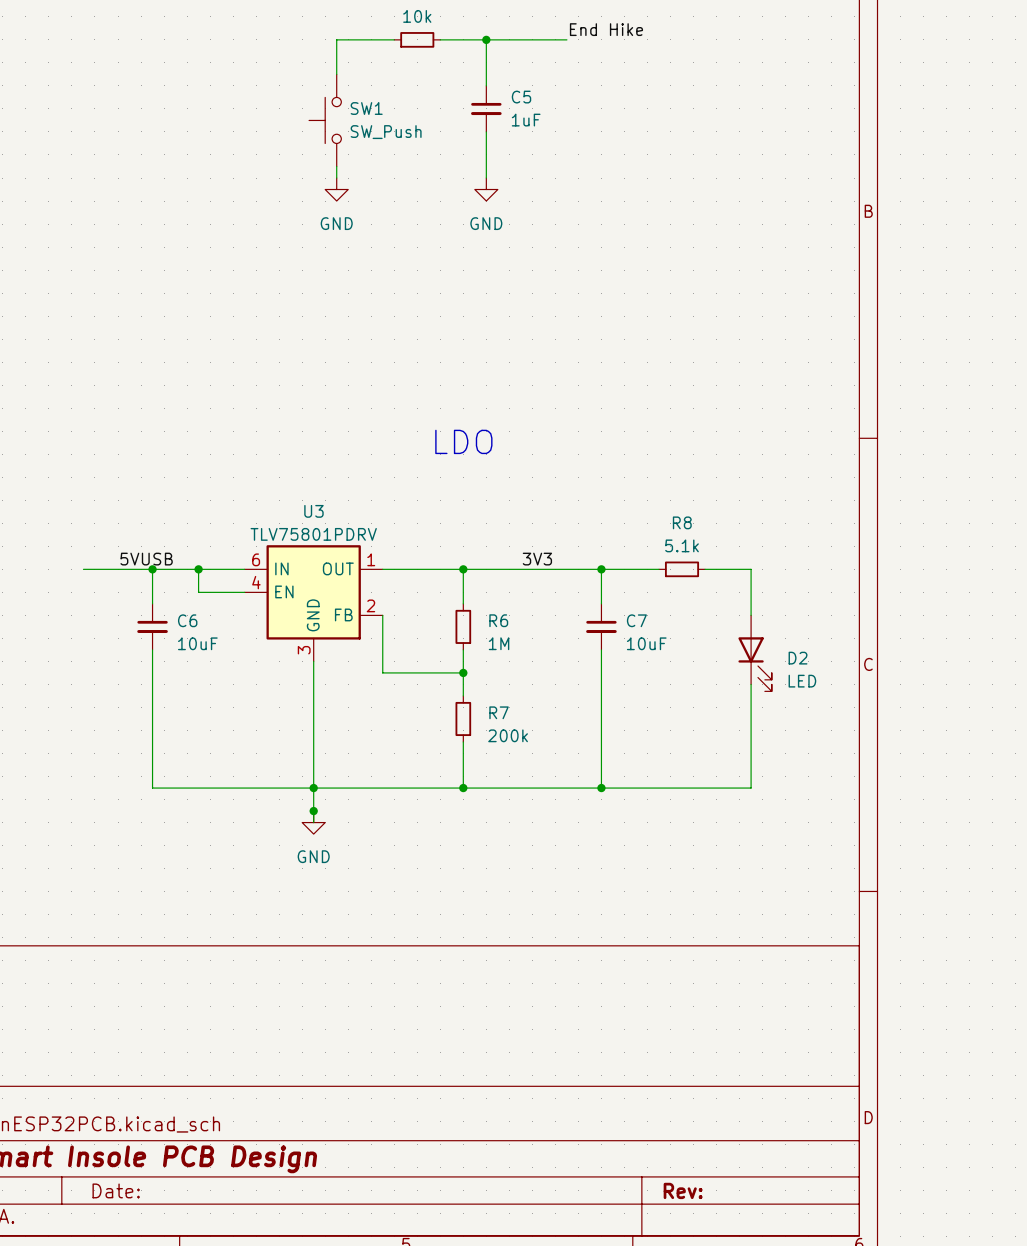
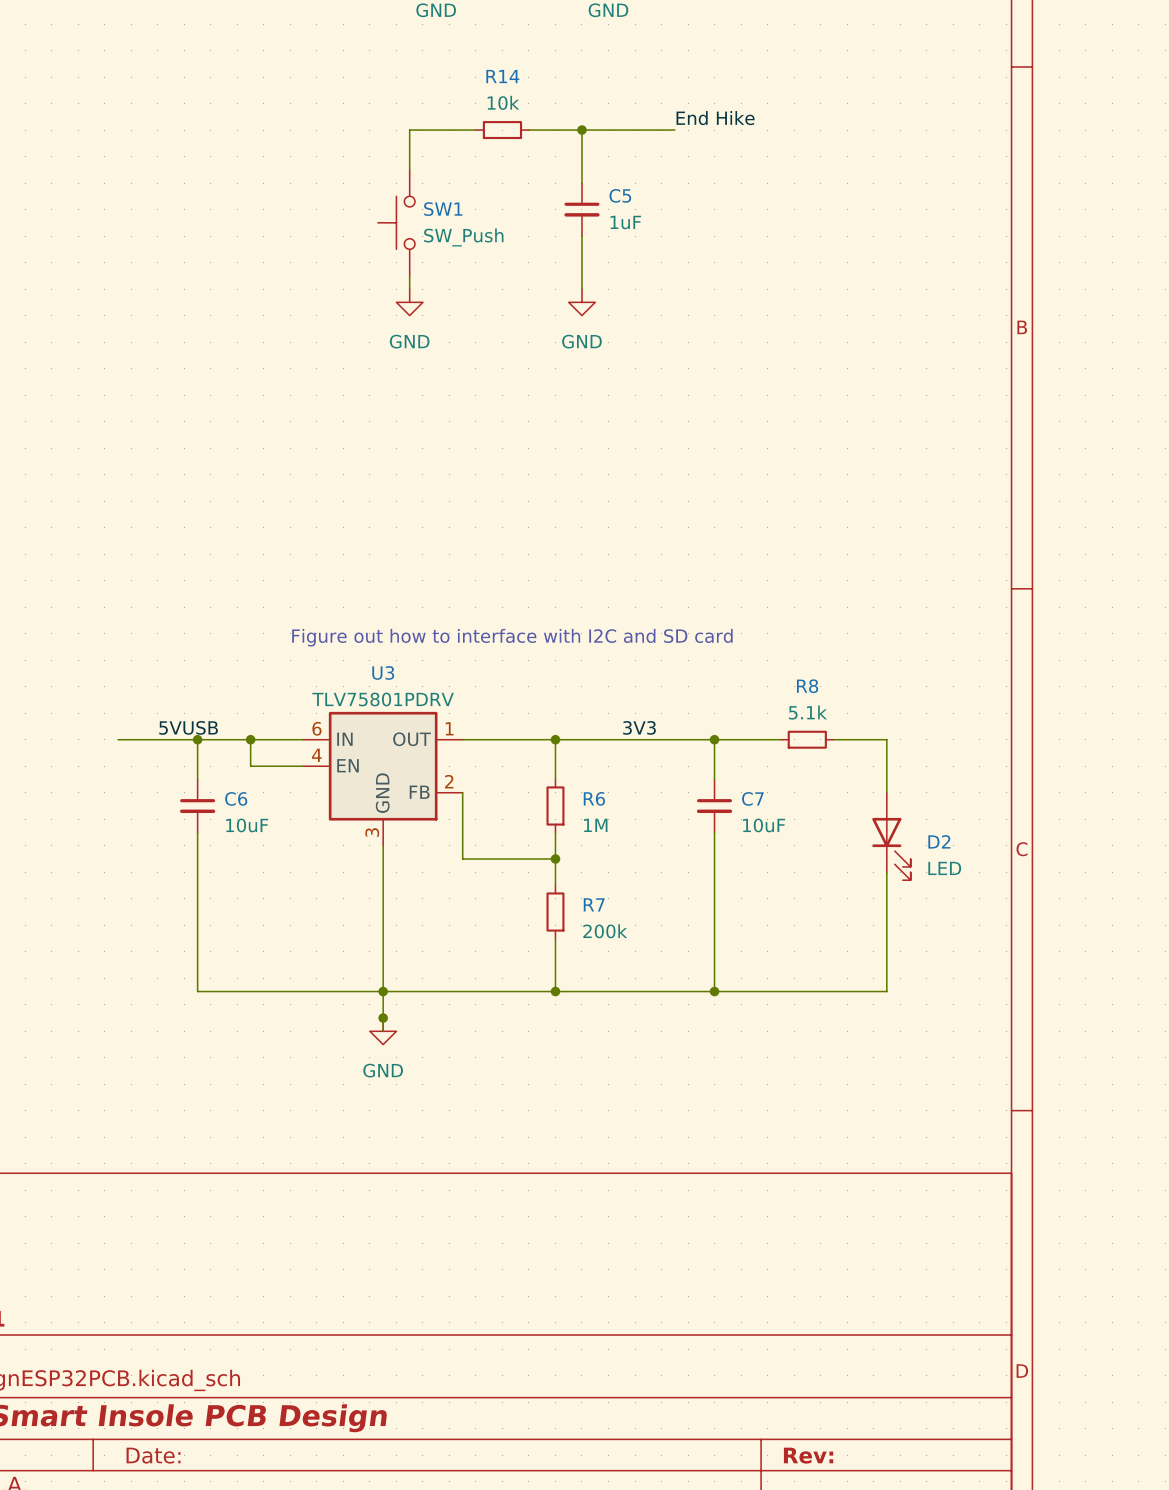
text: LDO (463, 441) -> none
text: none -> Figure out how to interface with I2C and SD card (512, 637)

